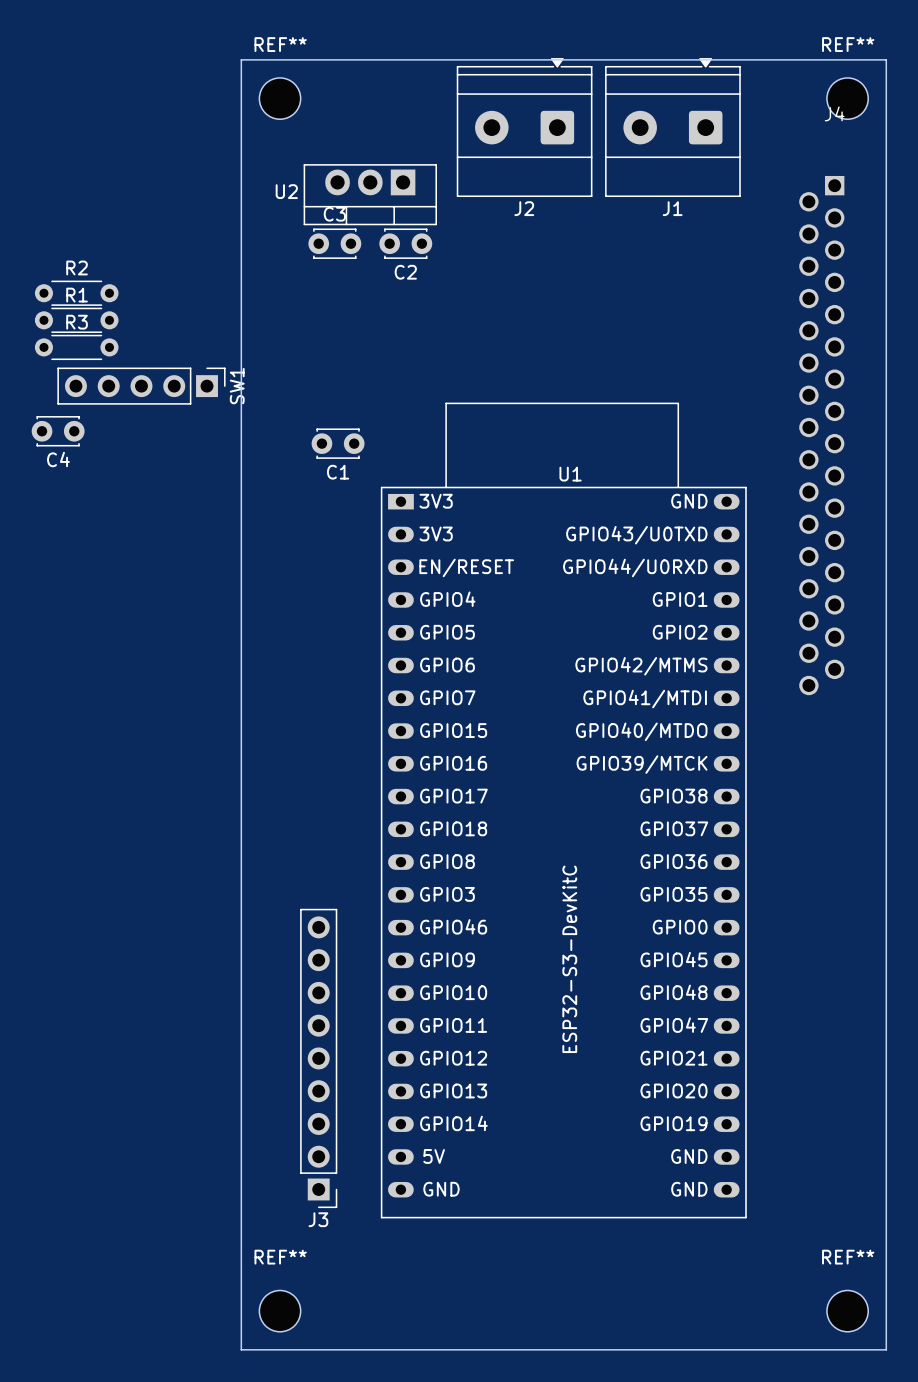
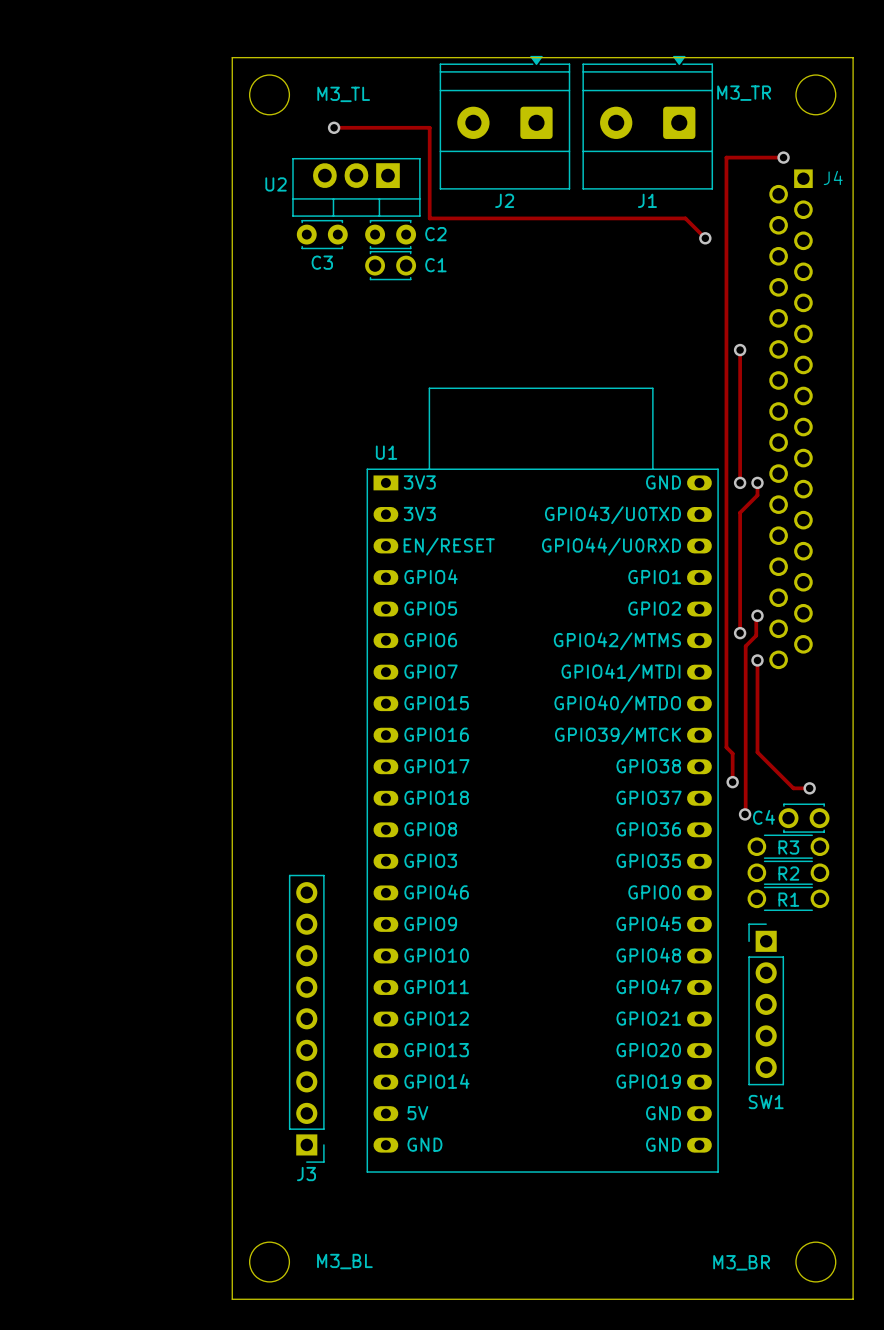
REF** name: REF** (280, 44) -> M3_TL (343, 94)
REF** name: REF** (848, 44) -> M3_TR (744, 93)
J4 name position: J4 (834, 113) -> J4 (833, 177)
track: none -> (334, 127) (429, 127) (429, 218) (685, 218) (705, 238)
via: none -> (334, 127)
track: none -> (783, 157) (726, 157) (726, 747) (732, 753) (732, 782)
via: none -> (783, 157)
C3 name position: C3 (334, 214) -> C3 (322, 262)
via: none -> (705, 238)
R2 name position: R2 (77, 267) -> R2 (788, 873)
C2 name position: C2 (405, 272) -> C2 (435, 234)
R2 footprint: [34, 280, 119, 306] -> [747, 860, 830, 885]
R1 name position: R1 (77, 295) -> R1 (788, 899)
R1 footprint: [34, 307, 119, 333] -> [747, 886, 830, 912]
R3 name position: R3 (77, 322) -> R3 (788, 847)
R3 footprint: [34, 334, 119, 361] -> [747, 834, 830, 859]
track: none -> (740, 350) (740, 482)
via: none -> (740, 350)
SW1 rotation: 0° (141, 386) -> 90° counterclockwise (766, 1004)
SW1 position: (141, 386) -> (766, 1004)
SW1 name position: SW1 (237, 386) -> SW1 (766, 1102)
C4 footprint: [31, 416, 85, 447] -> [778, 803, 830, 833]
C1 footprint: [311, 428, 365, 459] -> [365, 250, 417, 281]
C4 name position: C4 (58, 459) -> C4 (763, 817)
C1 name position: C1 (338, 472) -> C1 (435, 265)
U1 name position: U1 (570, 474) -> U1 (386, 452)
via: none -> (740, 482)
track: none -> (757, 482) (757, 495) (740, 512) (740, 633)
via: none -> (757, 482)
track: none -> (757, 615) (756, 635) (745, 646) (745, 814)
via: none -> (757, 615)
via: none -> (740, 633)
track: none -> (757, 660) (757, 752) (793, 788) (809, 788)
via: none -> (757, 660)
via: none -> (732, 782)
via: none -> (809, 788)
via: none -> (745, 814)
U1 value: ESP32-S3-DevKitC (569, 959) -> none
REF** name: REF** (280, 1257) -> M3_BL (344, 1261)
REF** name: REF** (848, 1257) -> M3_BR (741, 1262)

